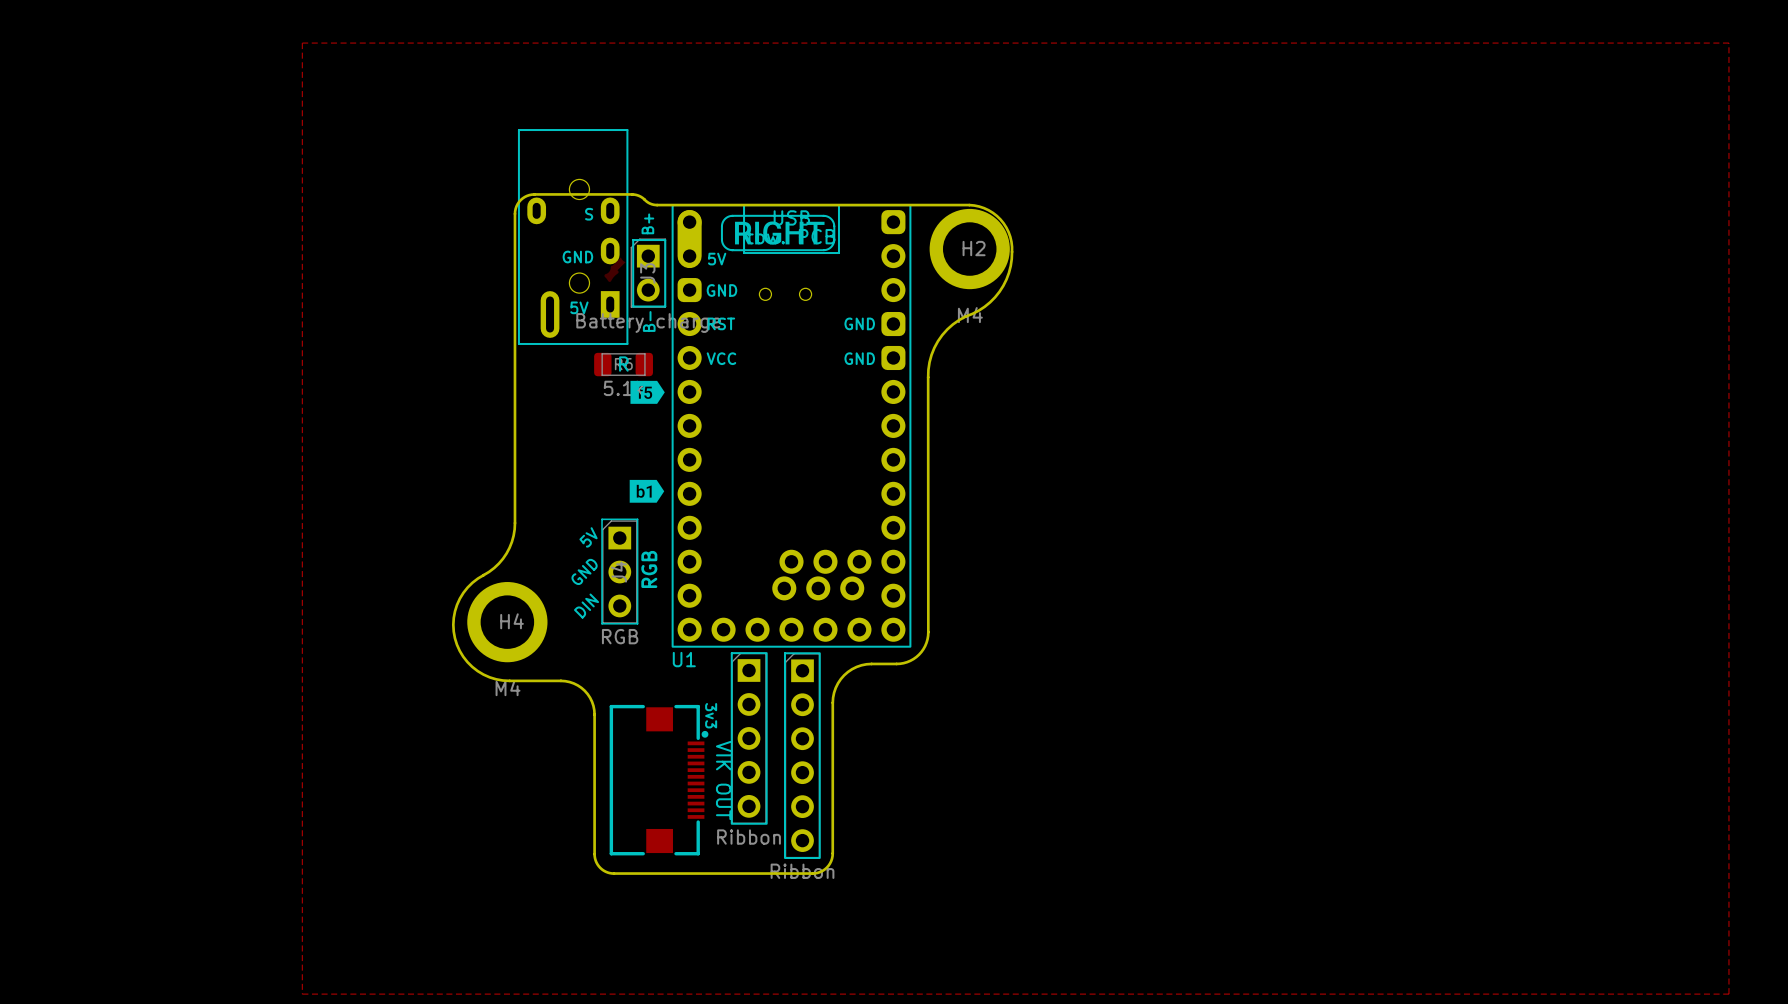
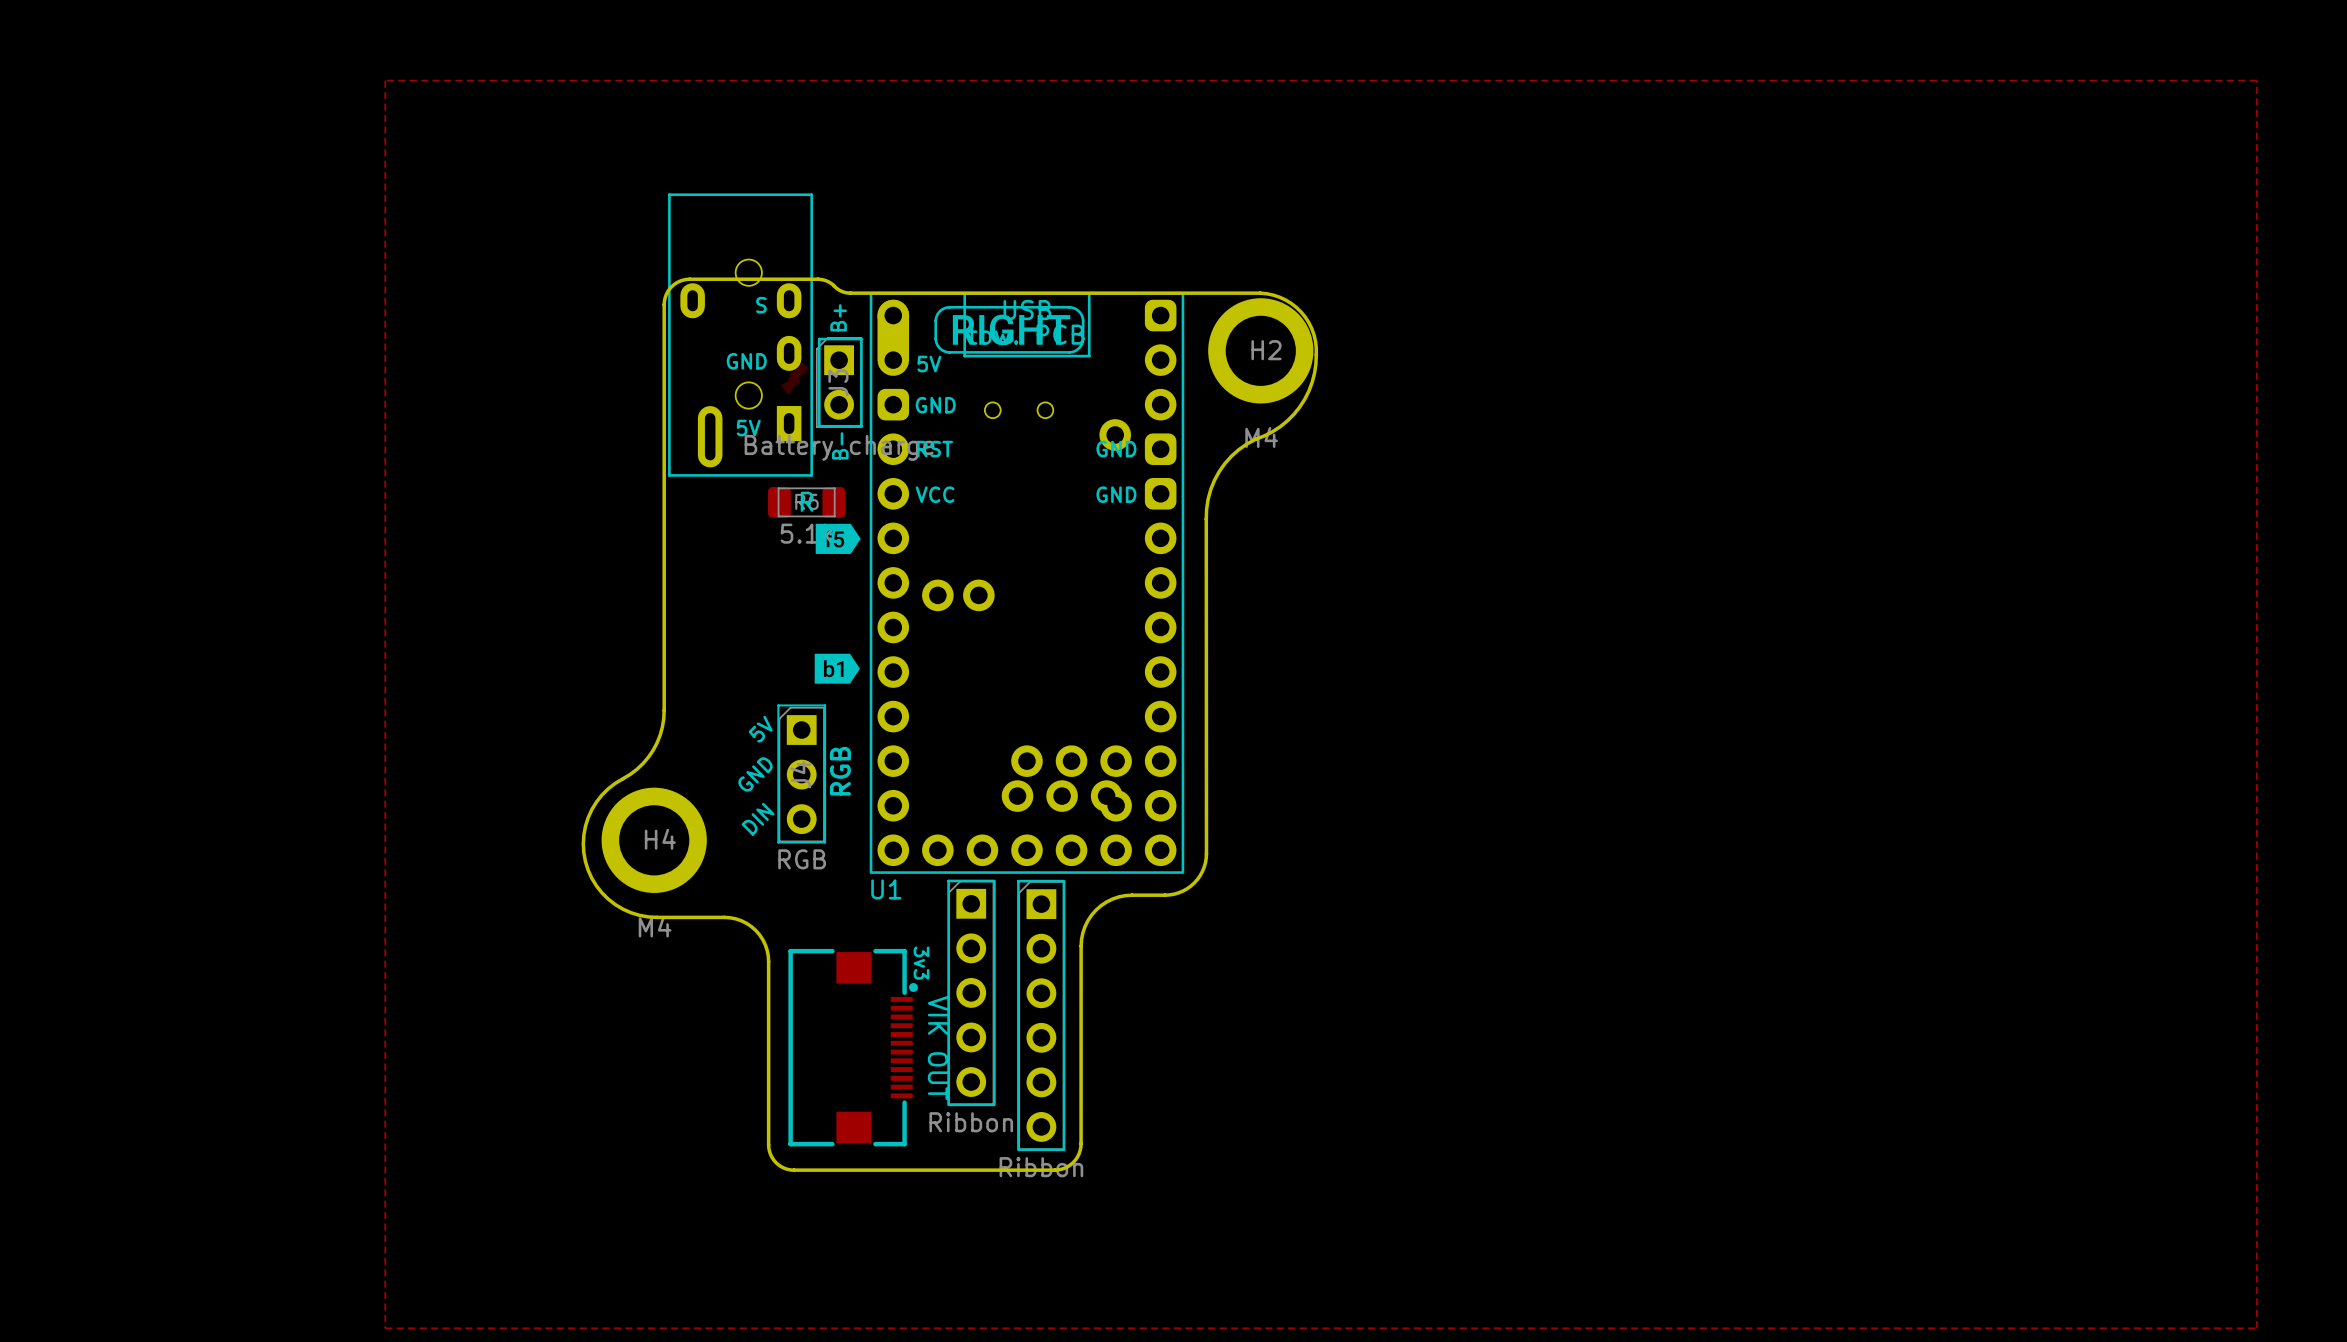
U1 footprint: [671, 204, 912, 648] -> [869, 291, 1185, 874]

